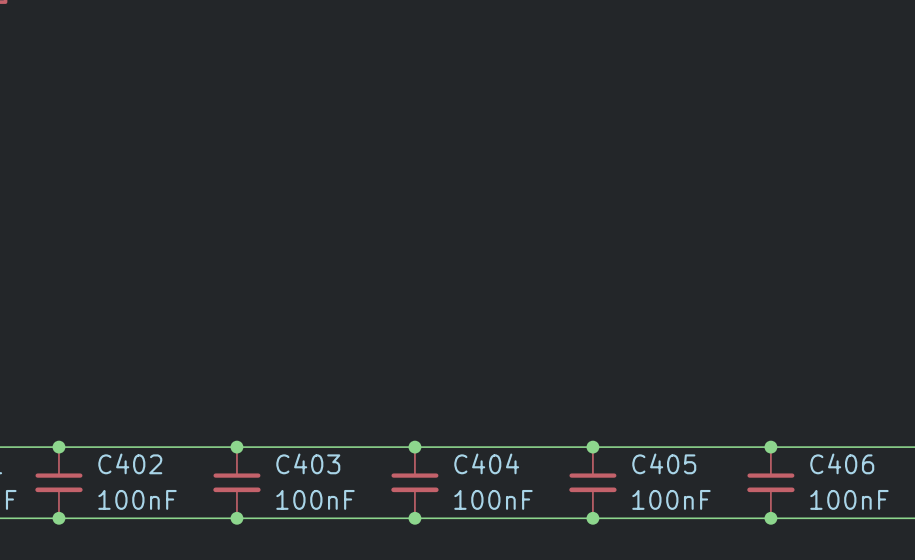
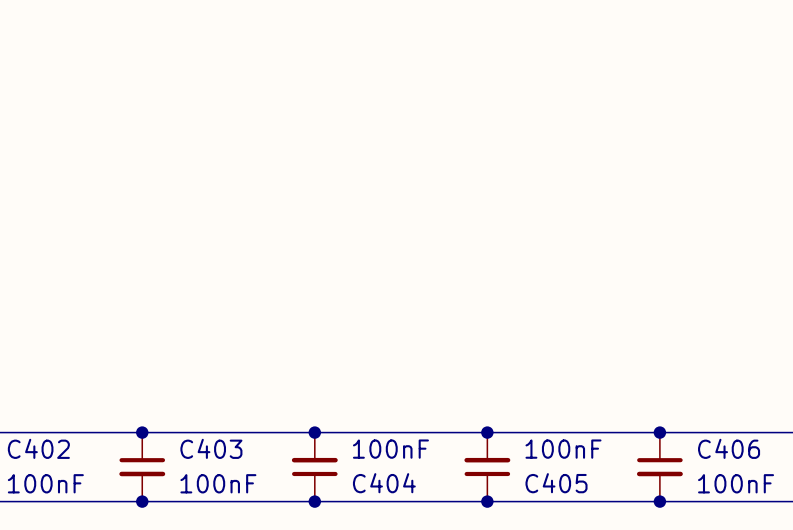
C404 name position: C404 (486, 463) -> C404 (384, 483)
C405 name position: C405 (664, 463) -> C405 (556, 483)
C404 rotation: 0° (414, 482) -> 180° (314, 467)
C405 rotation: 0° (592, 482) -> 180° (487, 467)
C404 value position: 100nF (493, 499) -> 100nF (390, 449)
C405 value position: 100nF (671, 499) -> 100nF (563, 449)

